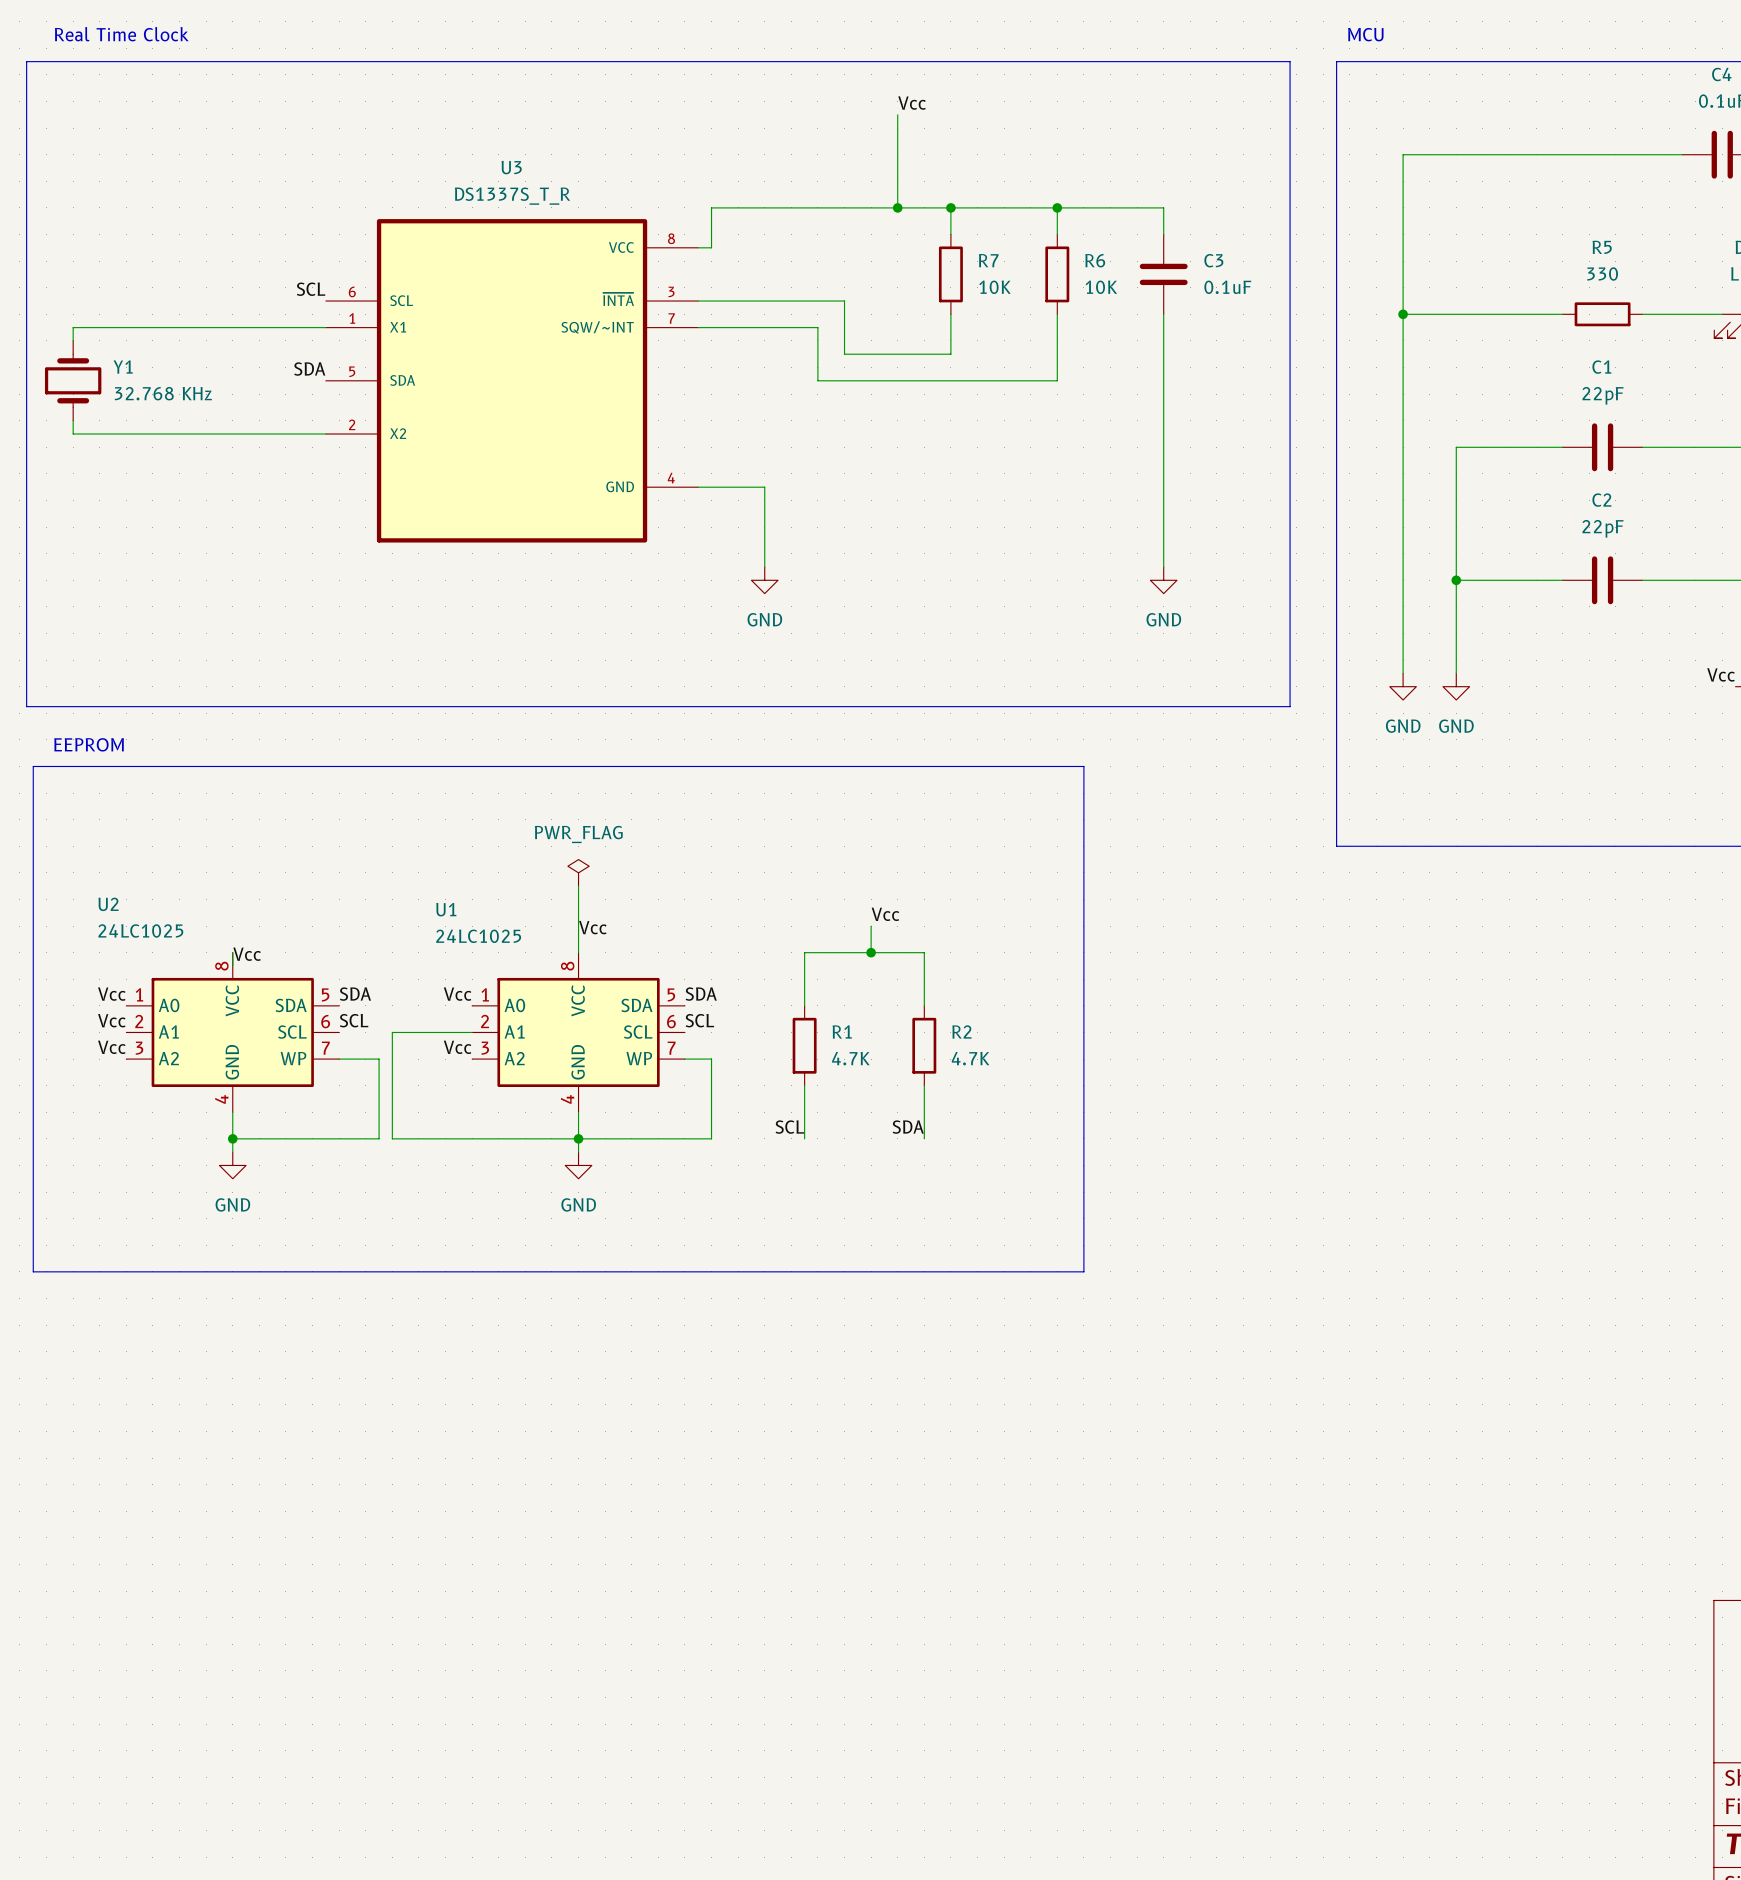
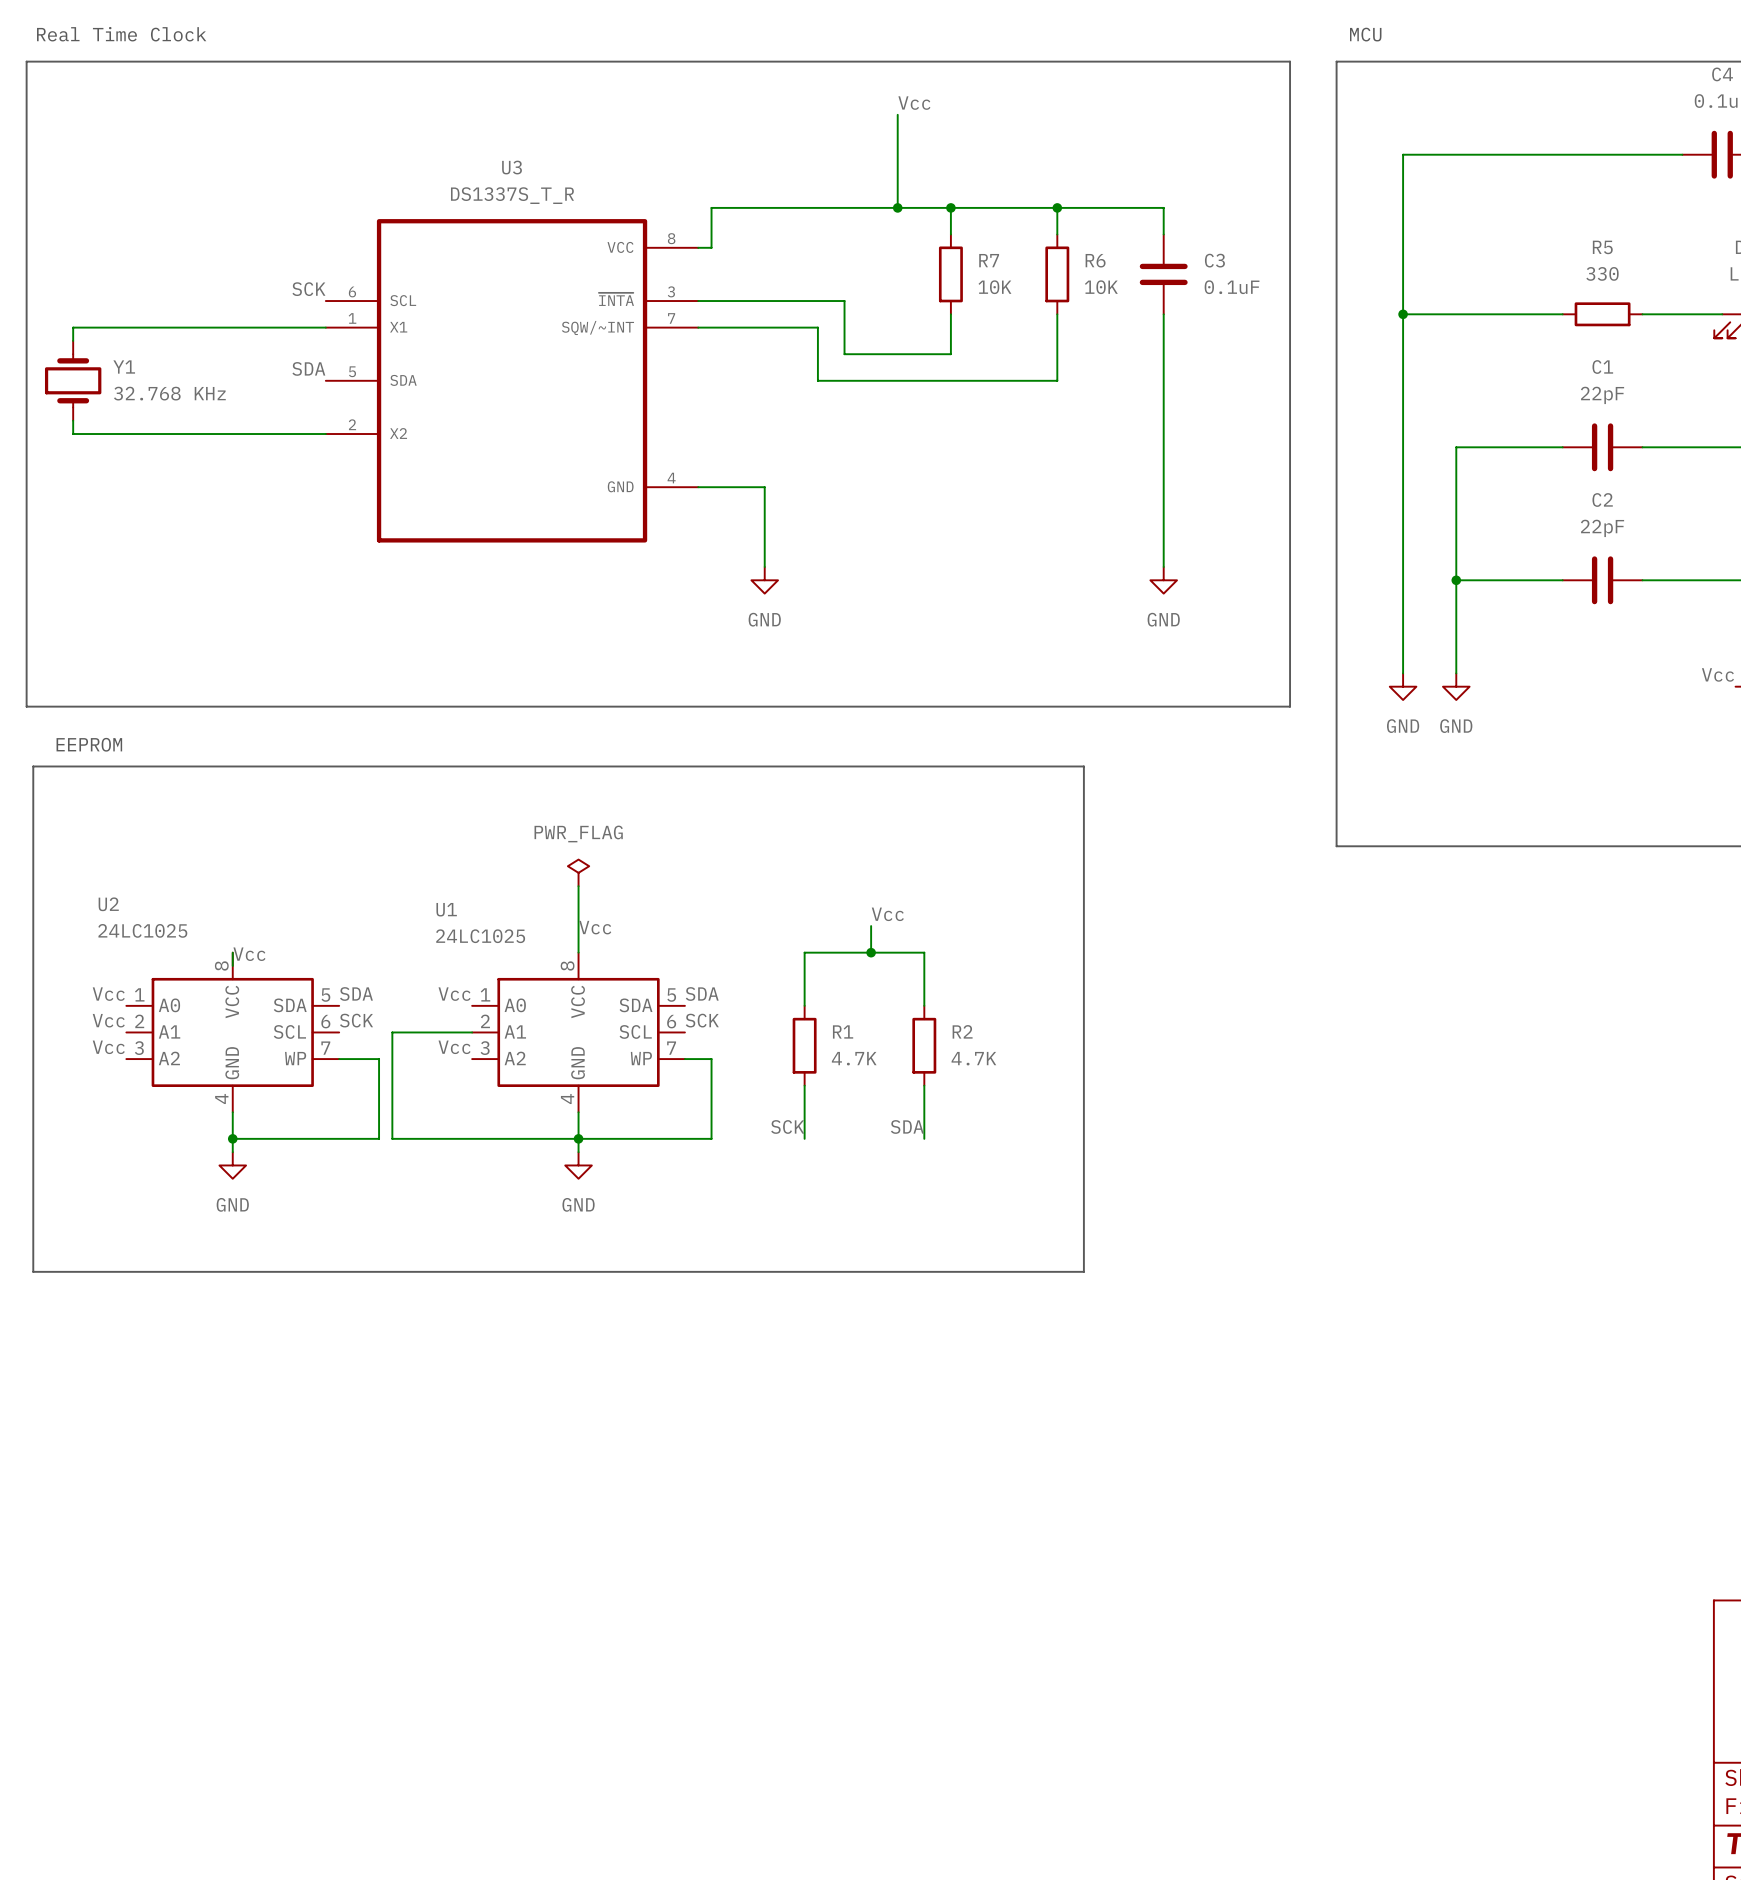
label: SCL (311, 289) -> SCK (308, 289)
label: SCL (354, 1020) -> SCK (356, 1020)
label: SCL (699, 1020) -> SCK (702, 1020)
label: SCL (789, 1127) -> SCK (787, 1126)

